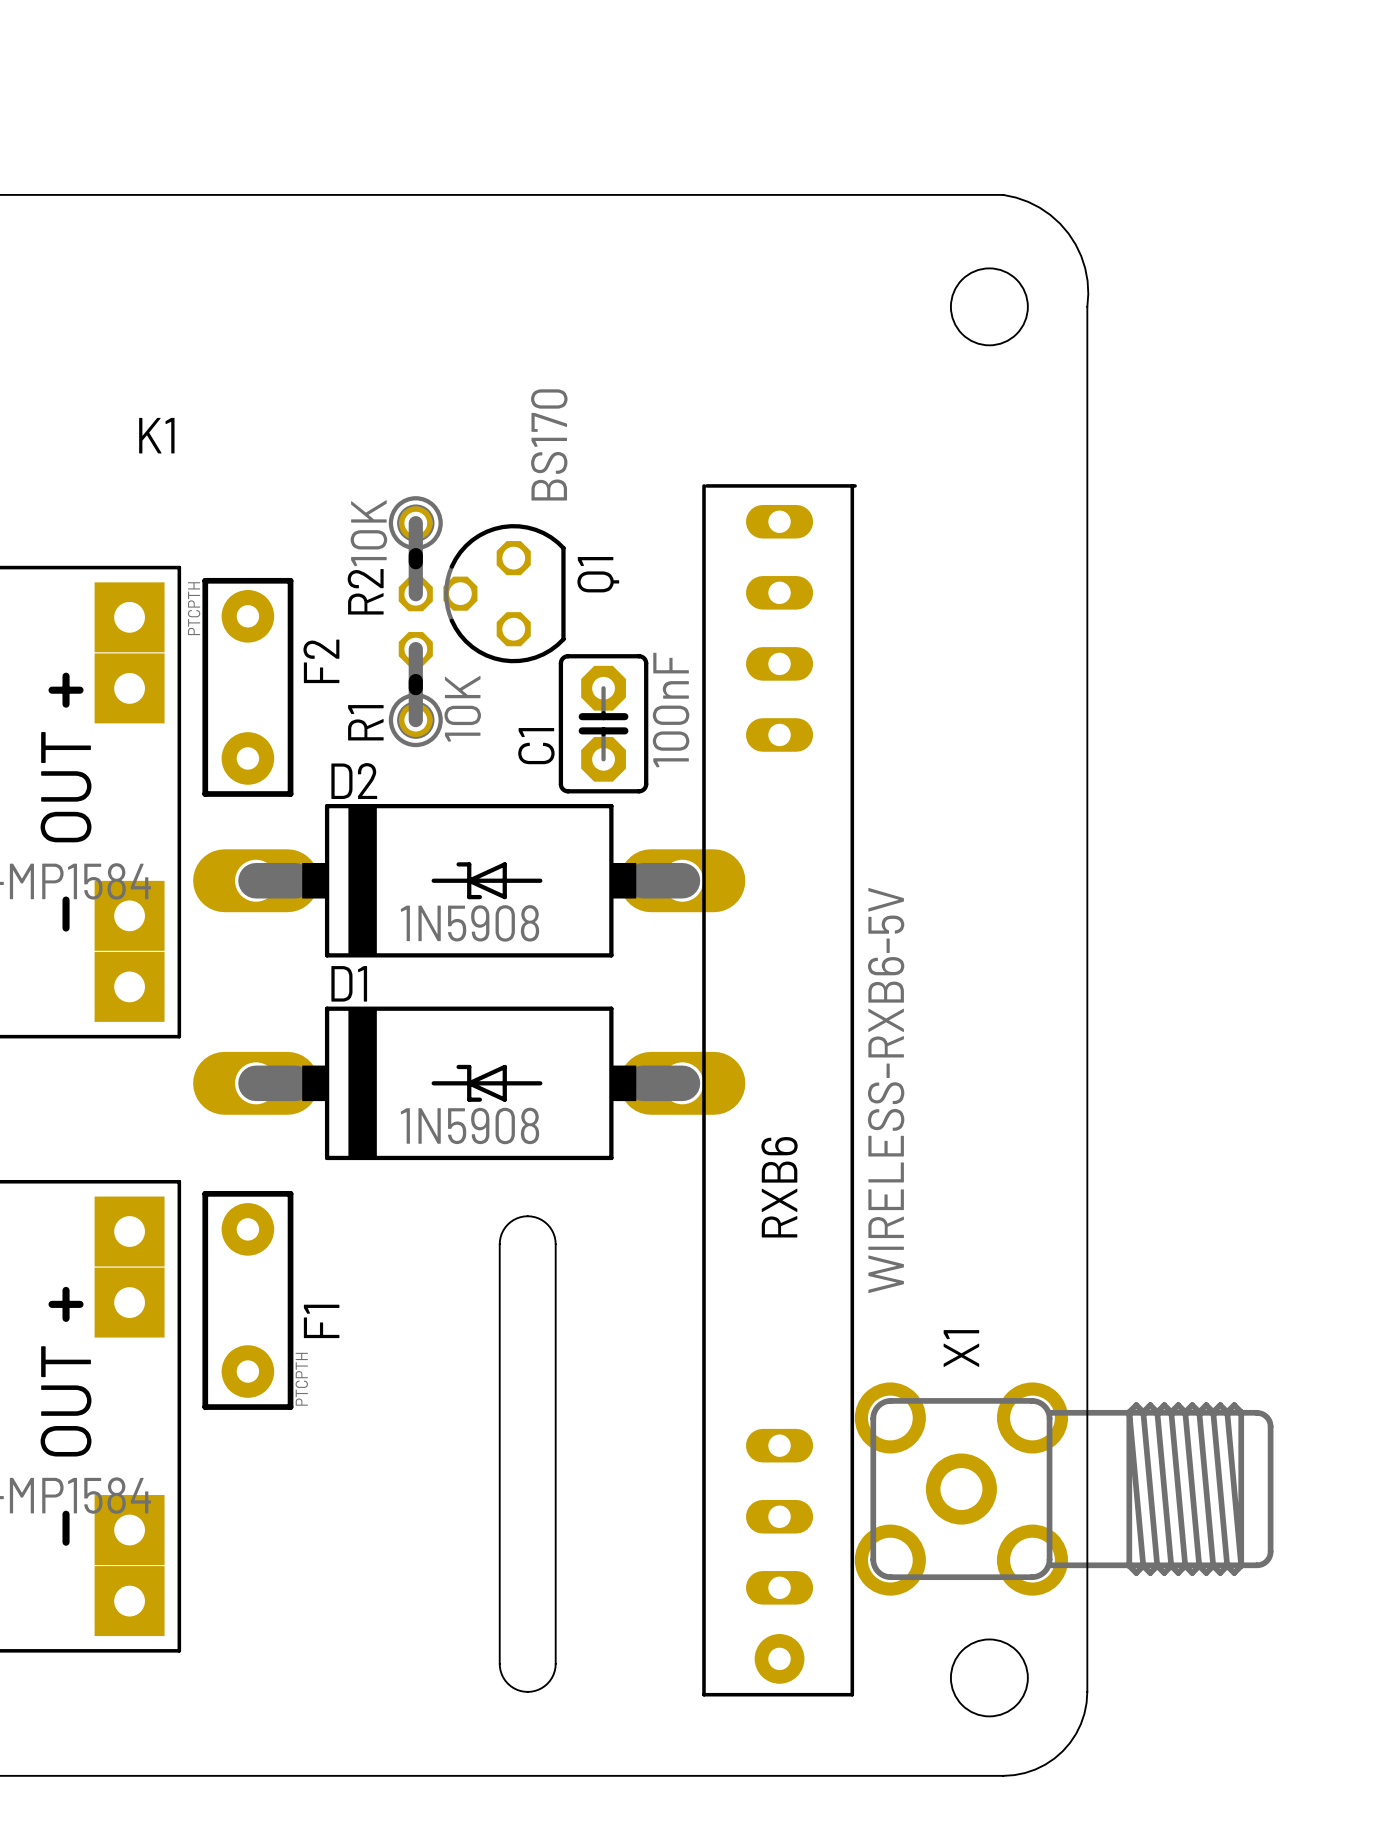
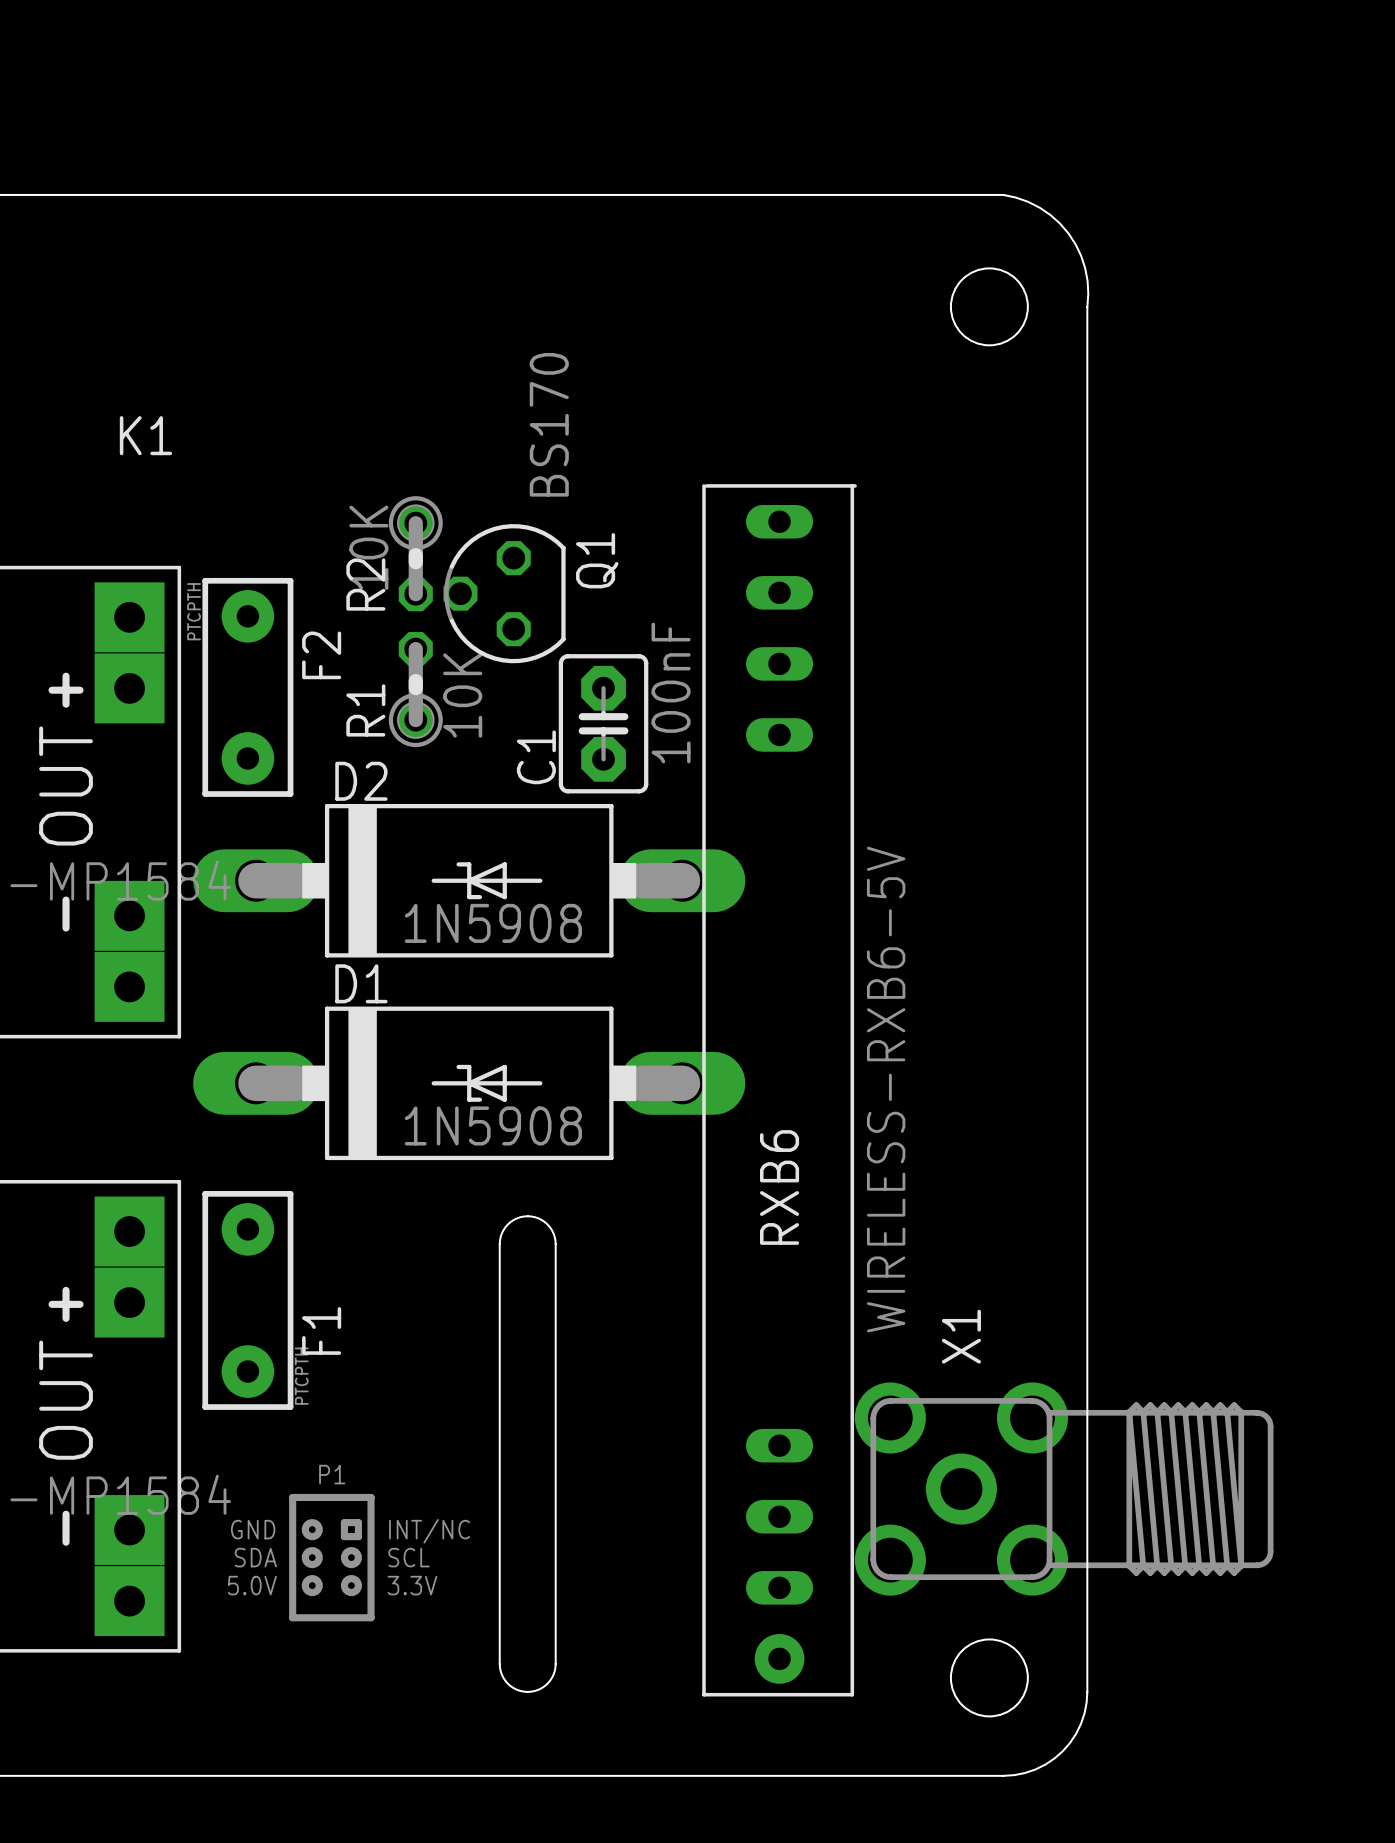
text: none -> P1 (332, 1474)
line: none -> (292, 1497) (292, 1617) (371, 1617) (371, 1497) (292, 1497)
drawing: none -> [301, 1519, 362, 1597]
line: none -> (344, 1522) (344, 1536) (358, 1536) (358, 1522) (344, 1522)
text: none -> GND (253, 1529)
text: none -> INT/NC (429, 1531)
text: none -> SDA (255, 1557)
text: none -> SCL (409, 1557)
text: none -> 5.0V (252, 1585)
text: none -> 3.3V (412, 1585)

